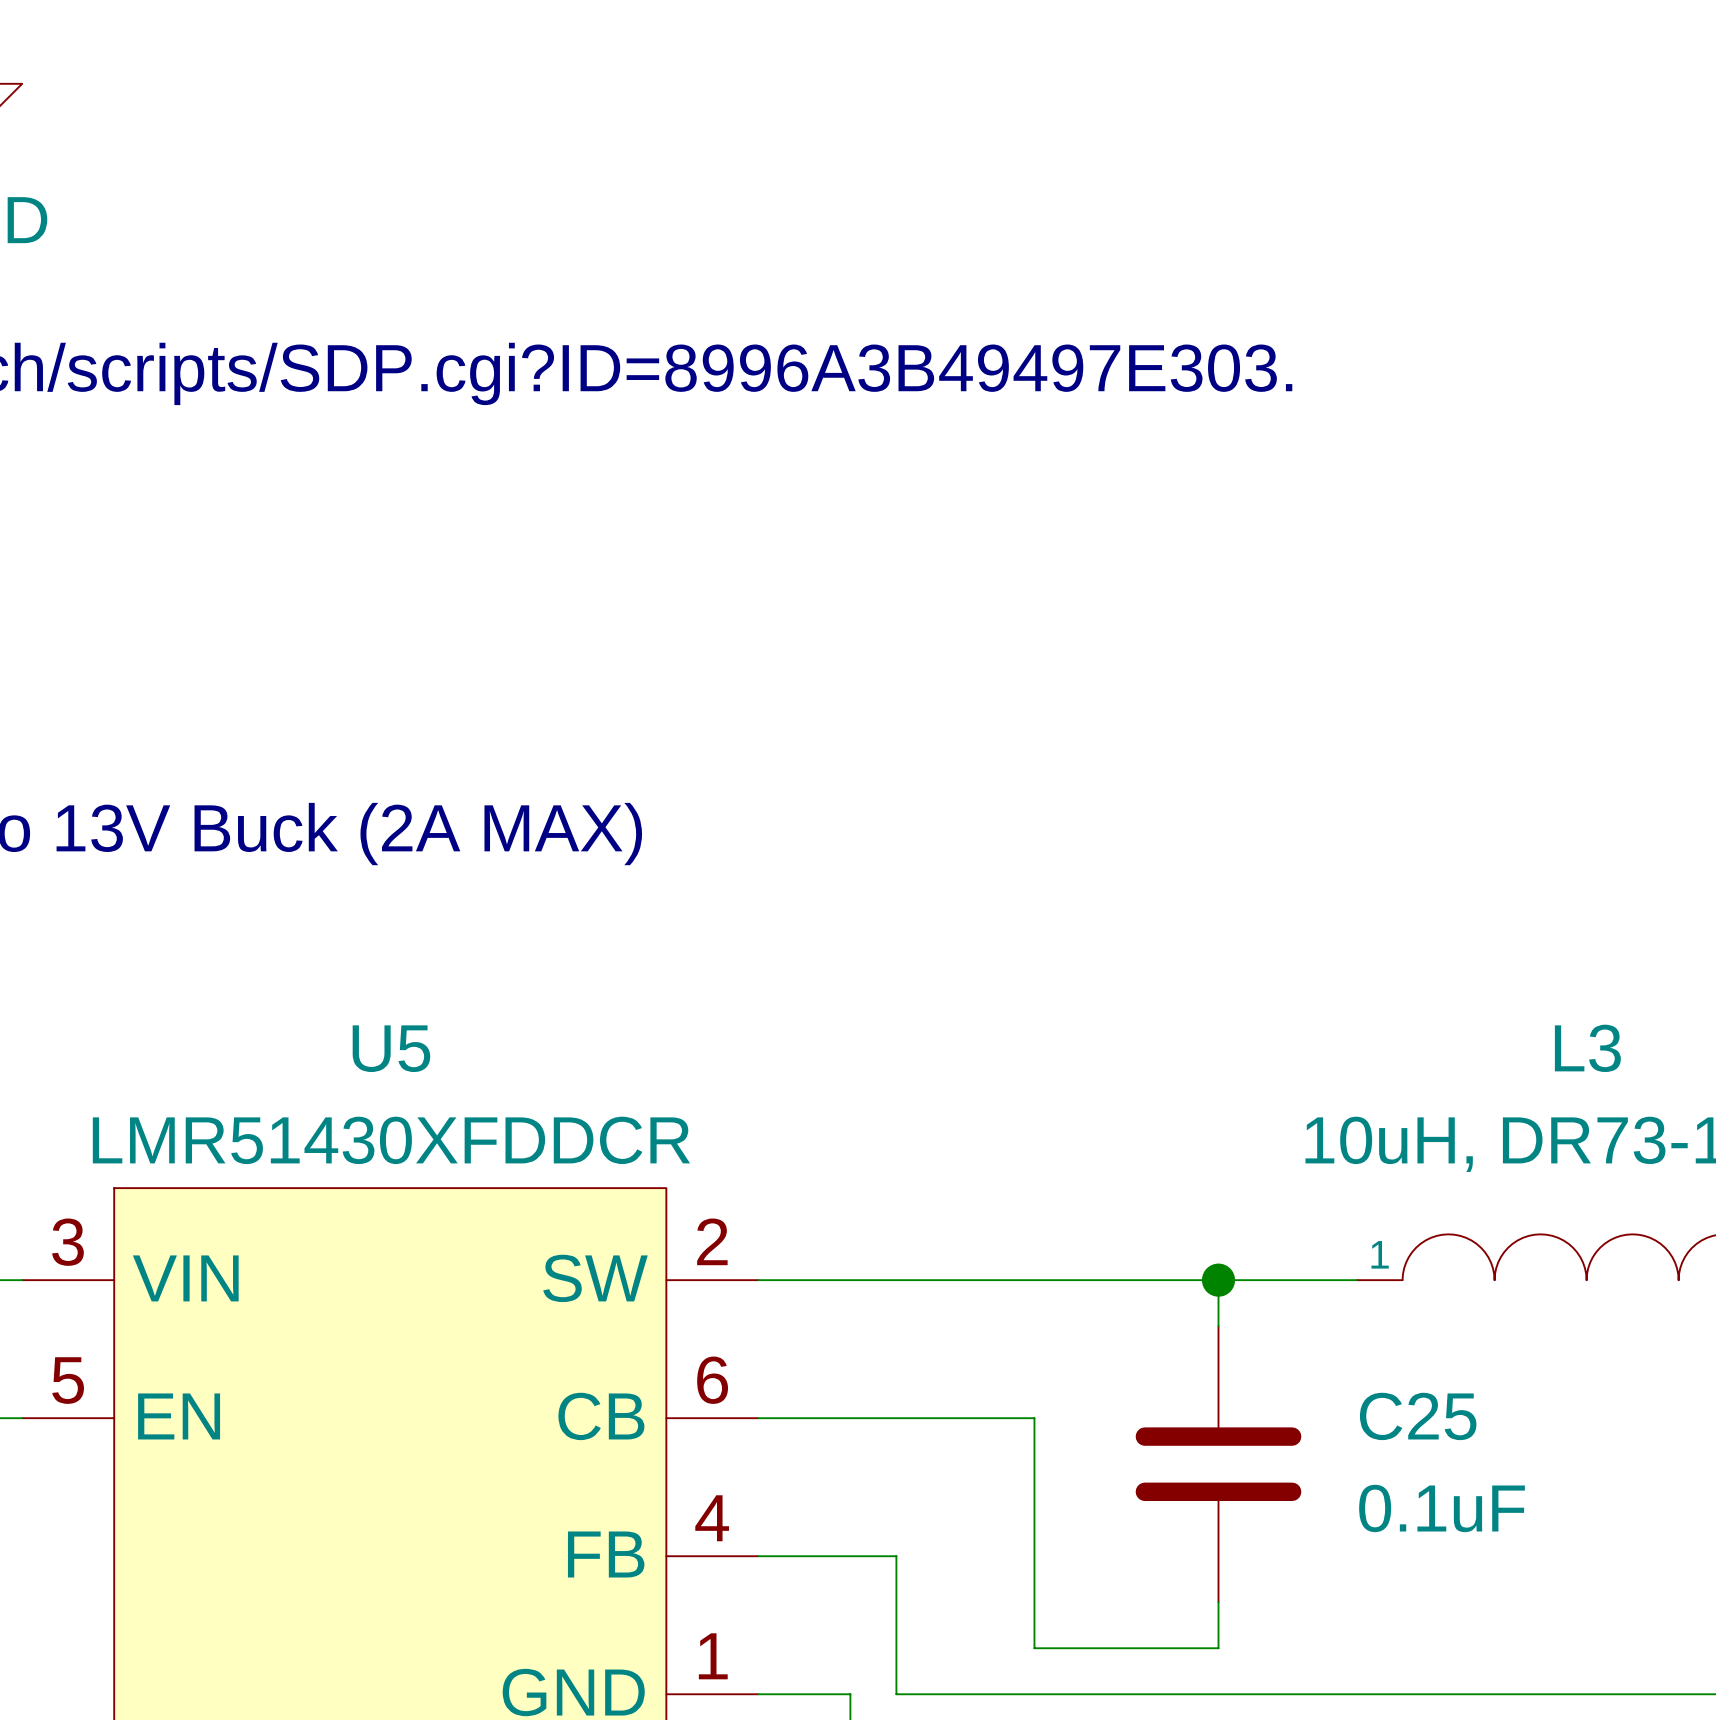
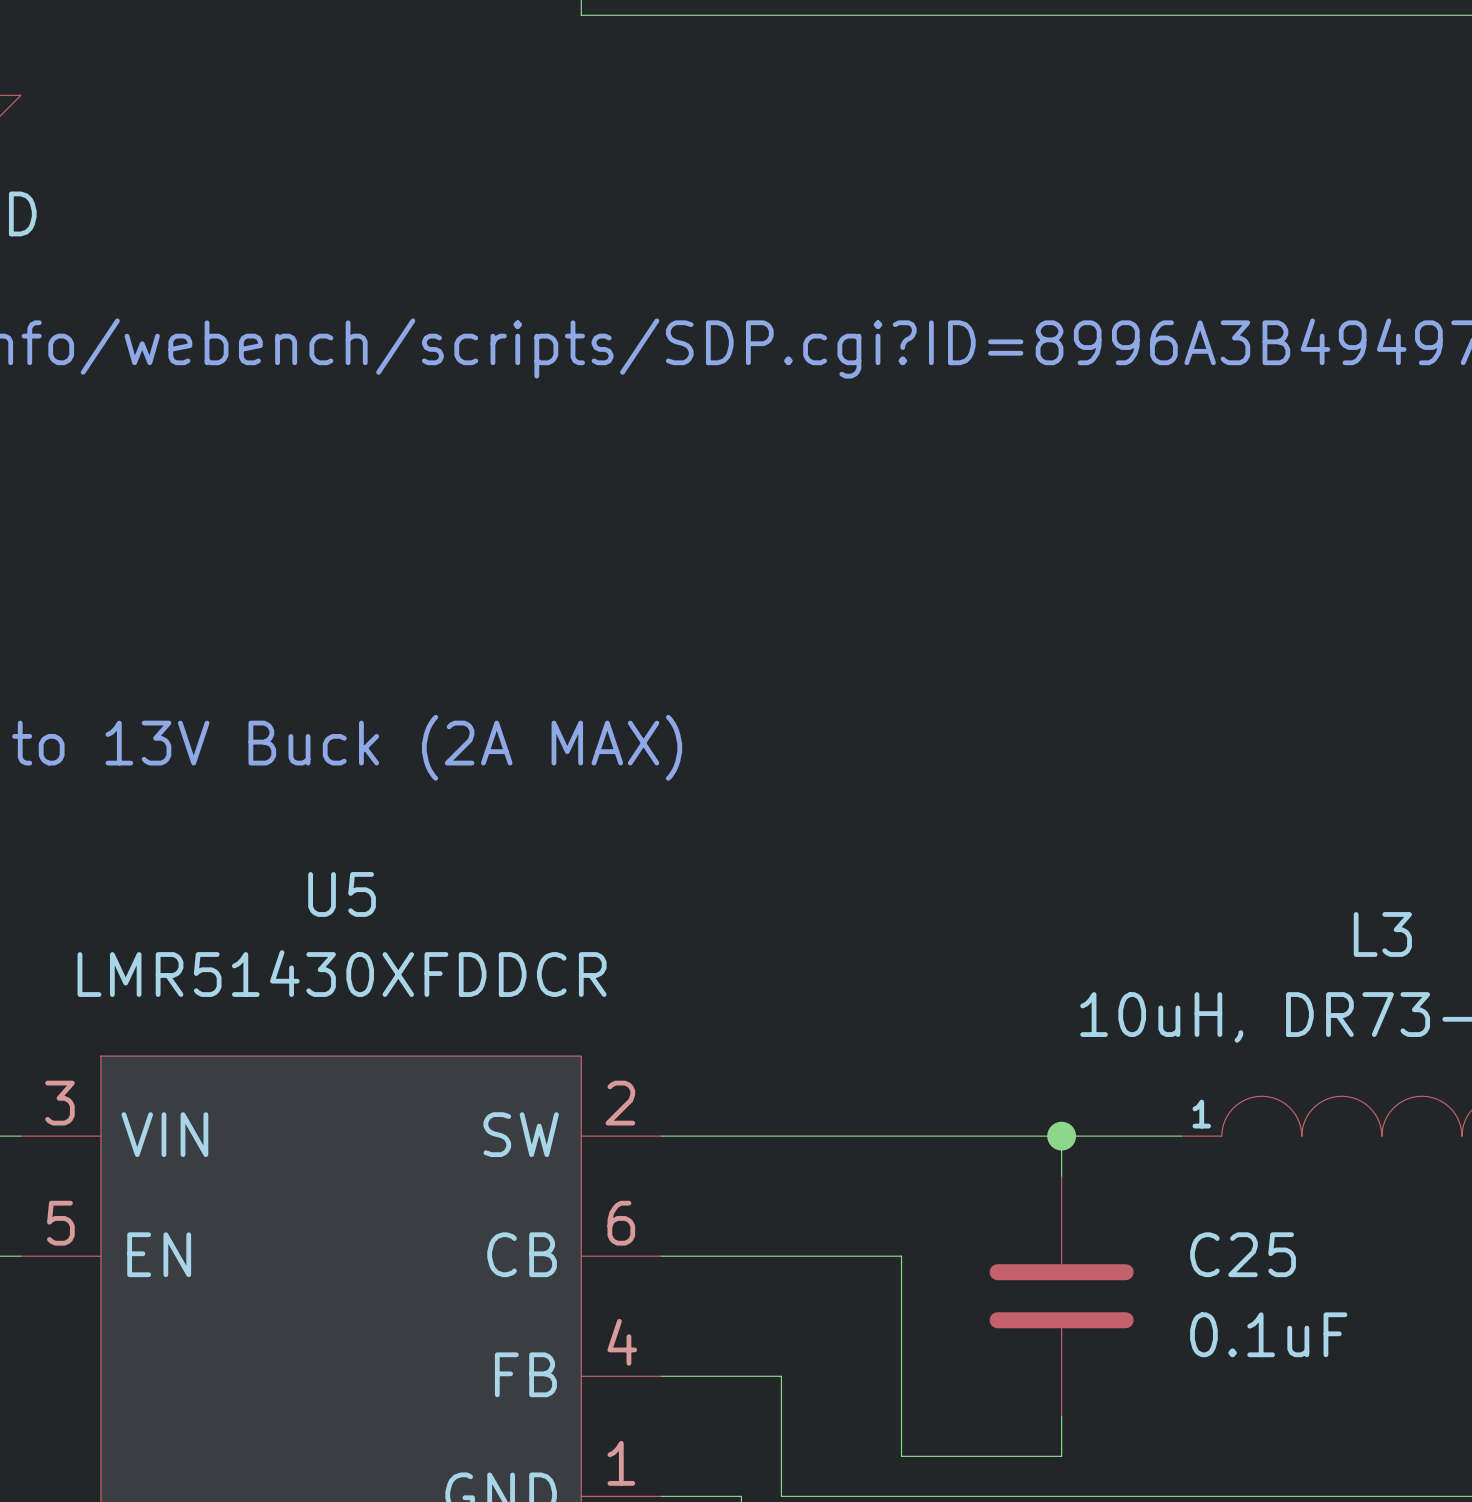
U5 name position: U5 (391, 1048) -> U5 (342, 894)
U5 value position: LMR51430XFDDCR (391, 1140) -> LMR51430XFDDCR (342, 973)

